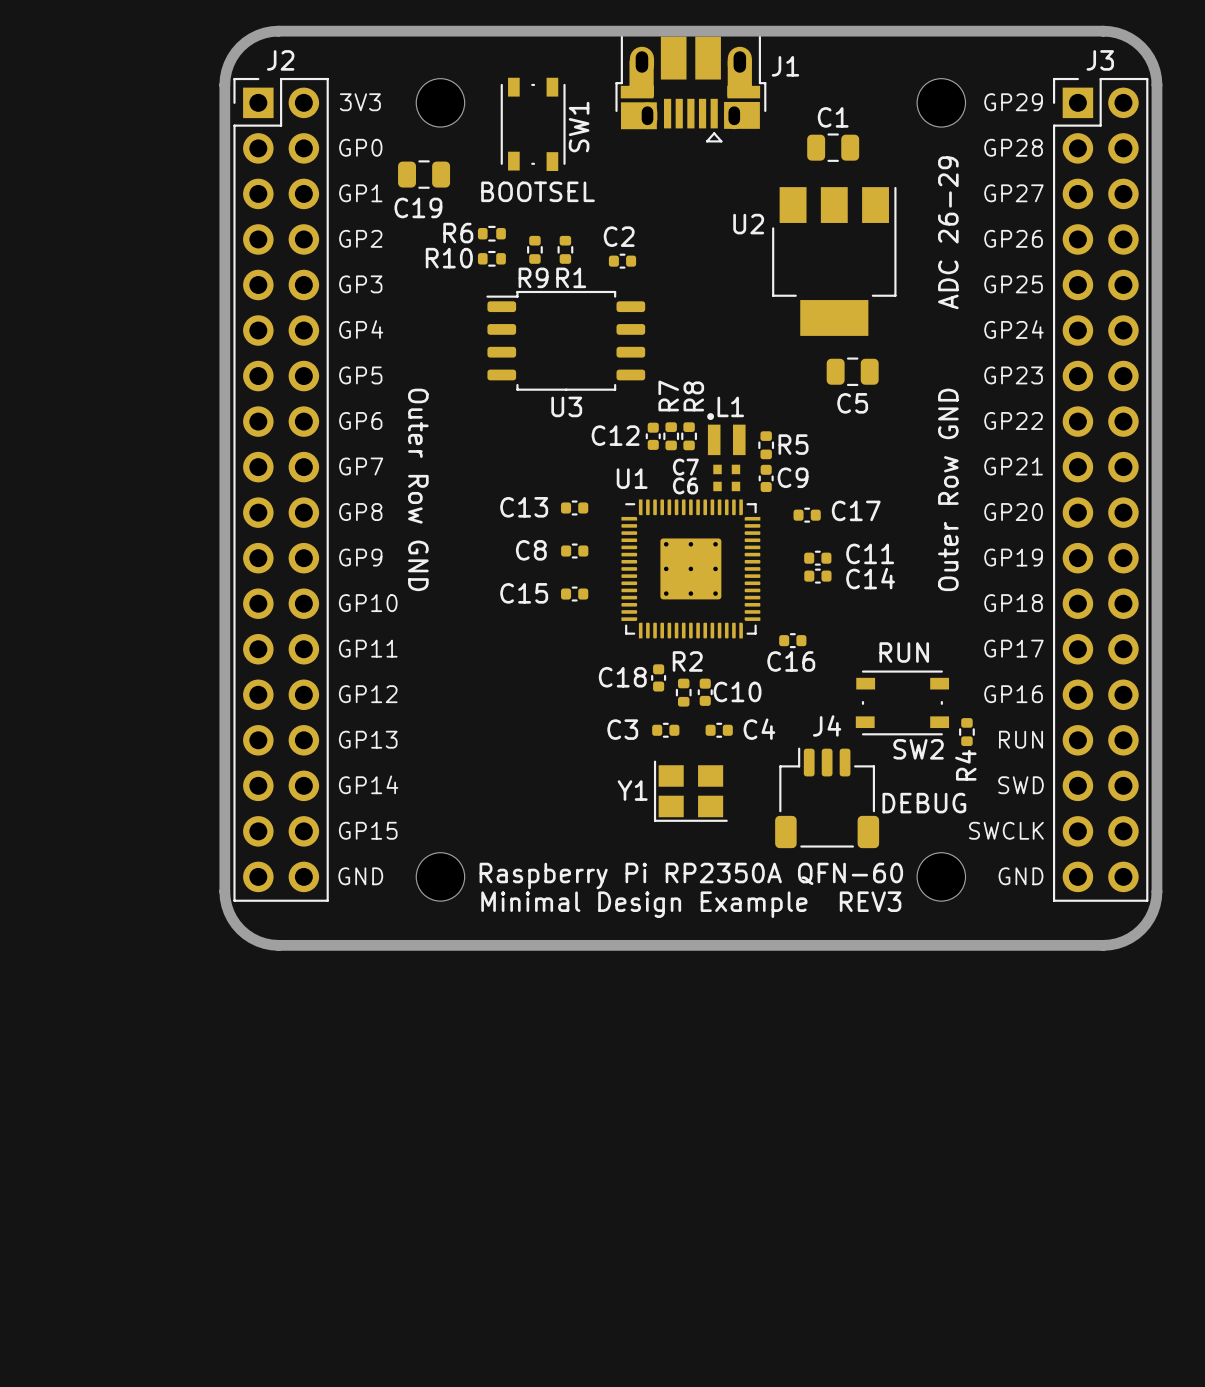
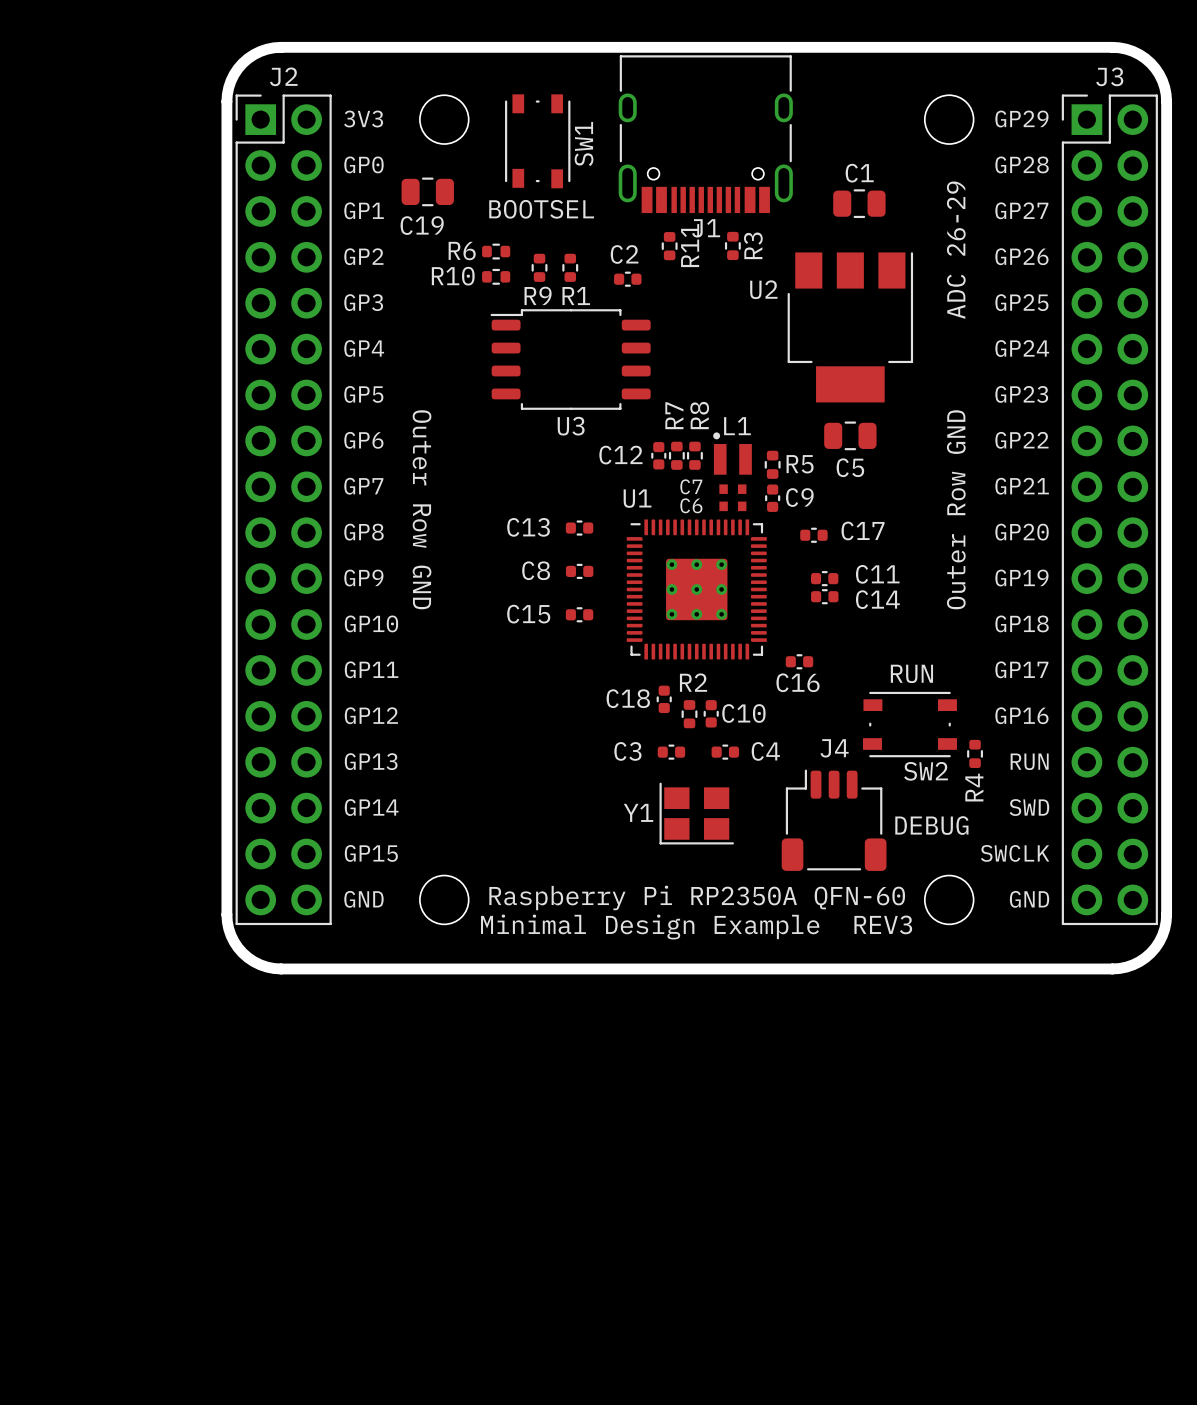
J1 footprint: [615, 31, 767, 143] -> [618, 55, 793, 214]
J1 name position: J1 (785, 66) -> J1 (706, 228)
C1 position: (833, 147) -> (859, 203)
R11: none -> (669, 246)
R3: none -> (732, 245)
U2 position: (834, 261) -> (850, 327)
C5 position: (852, 371) -> (850, 435)

